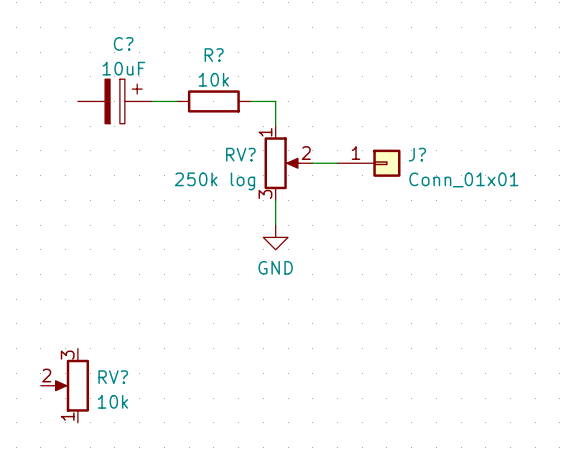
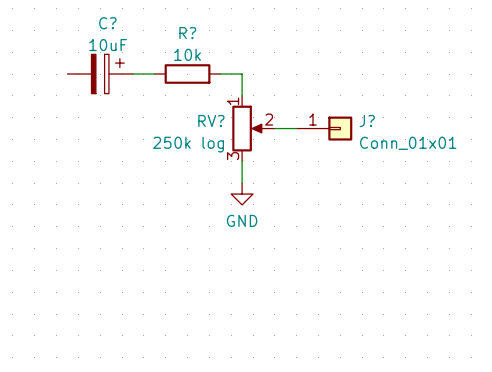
RV?: 10k (64, 385) -> none

